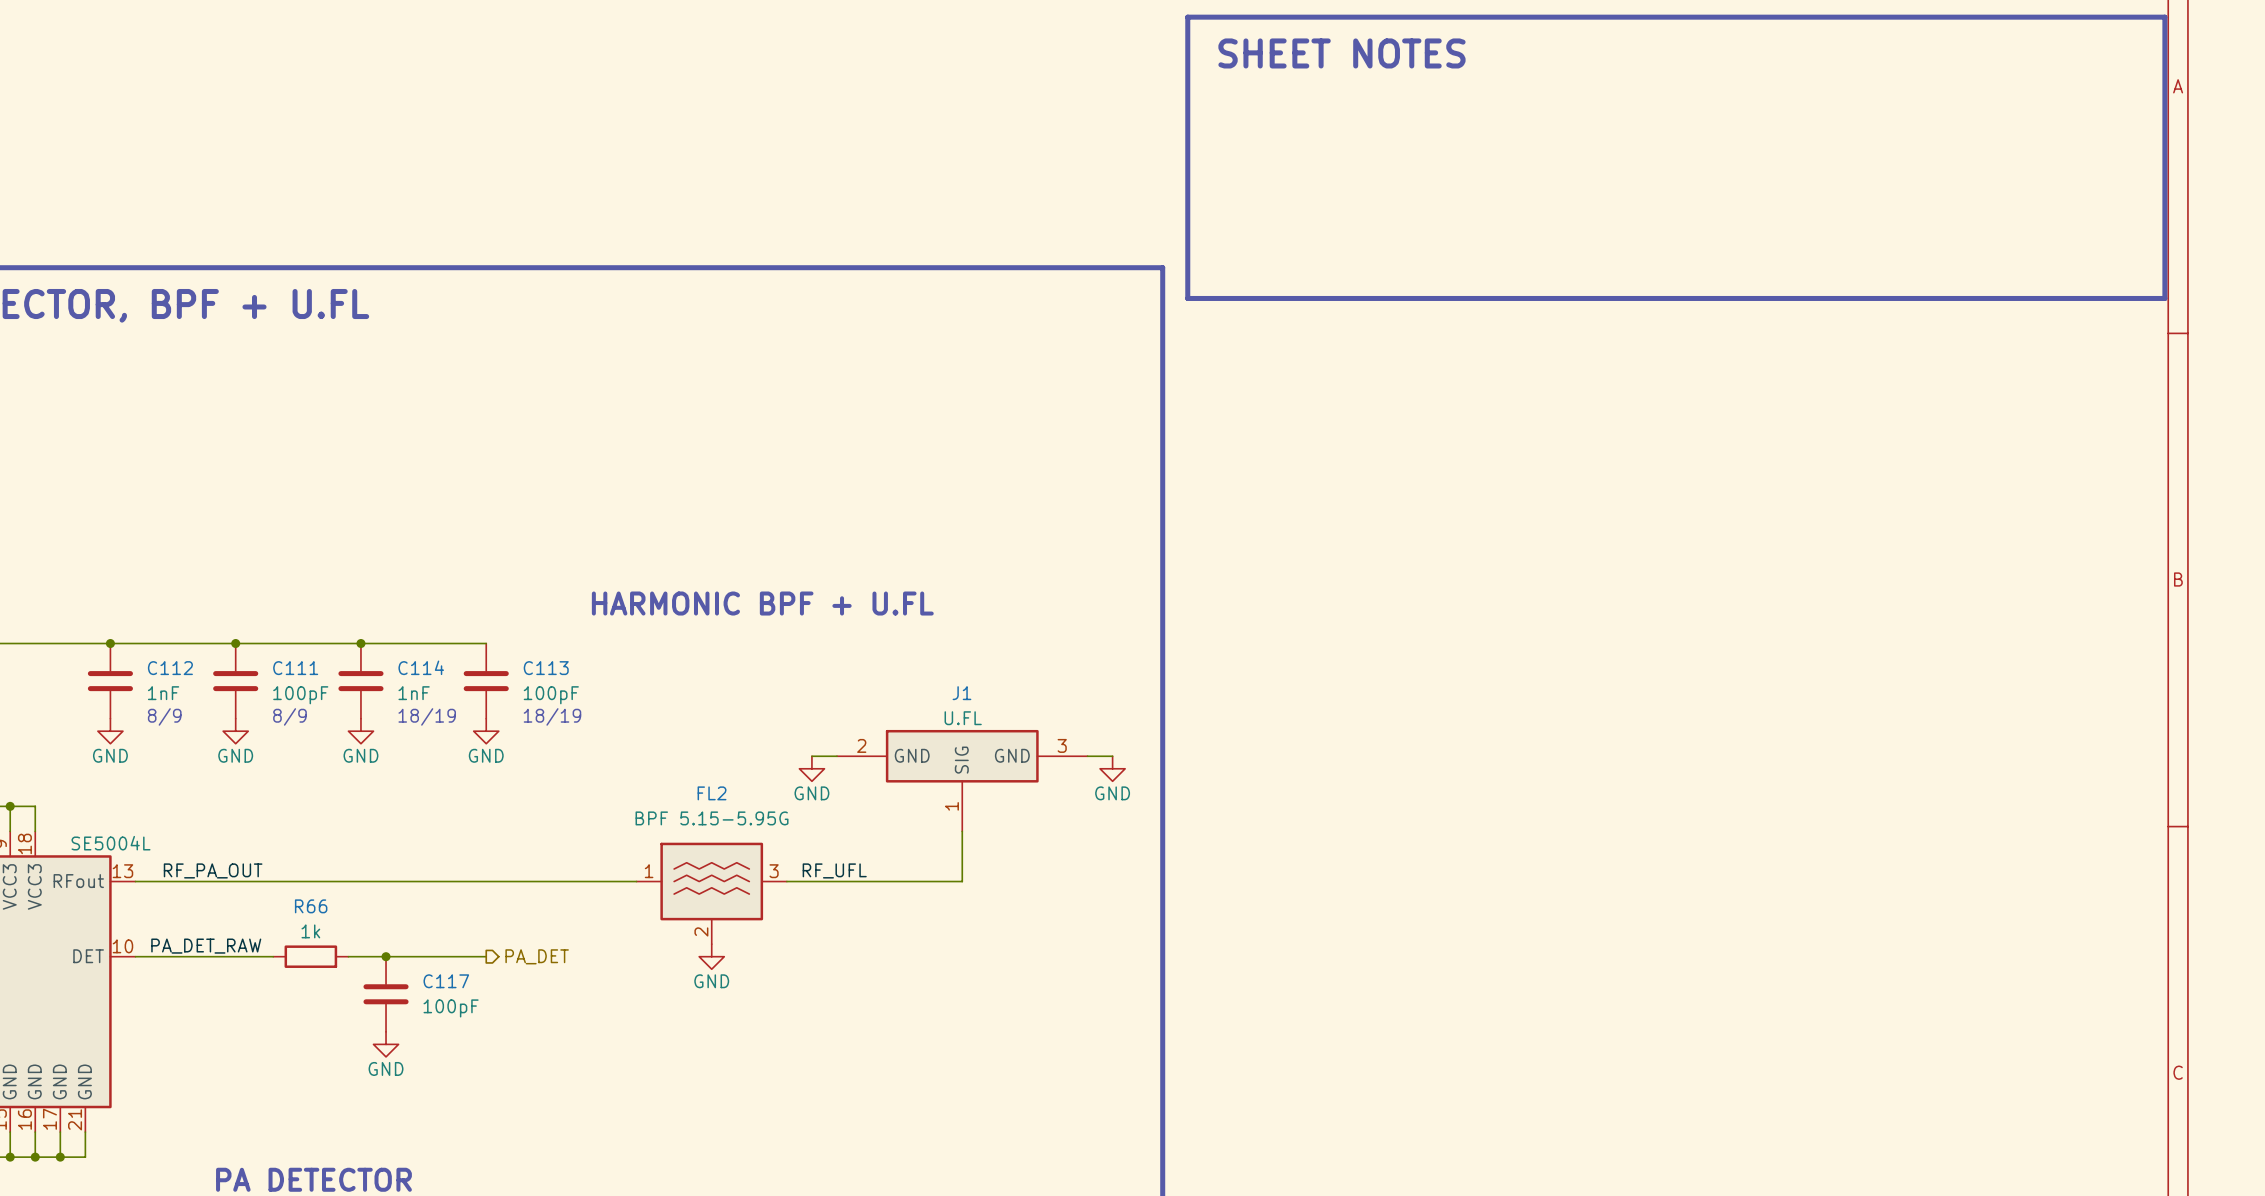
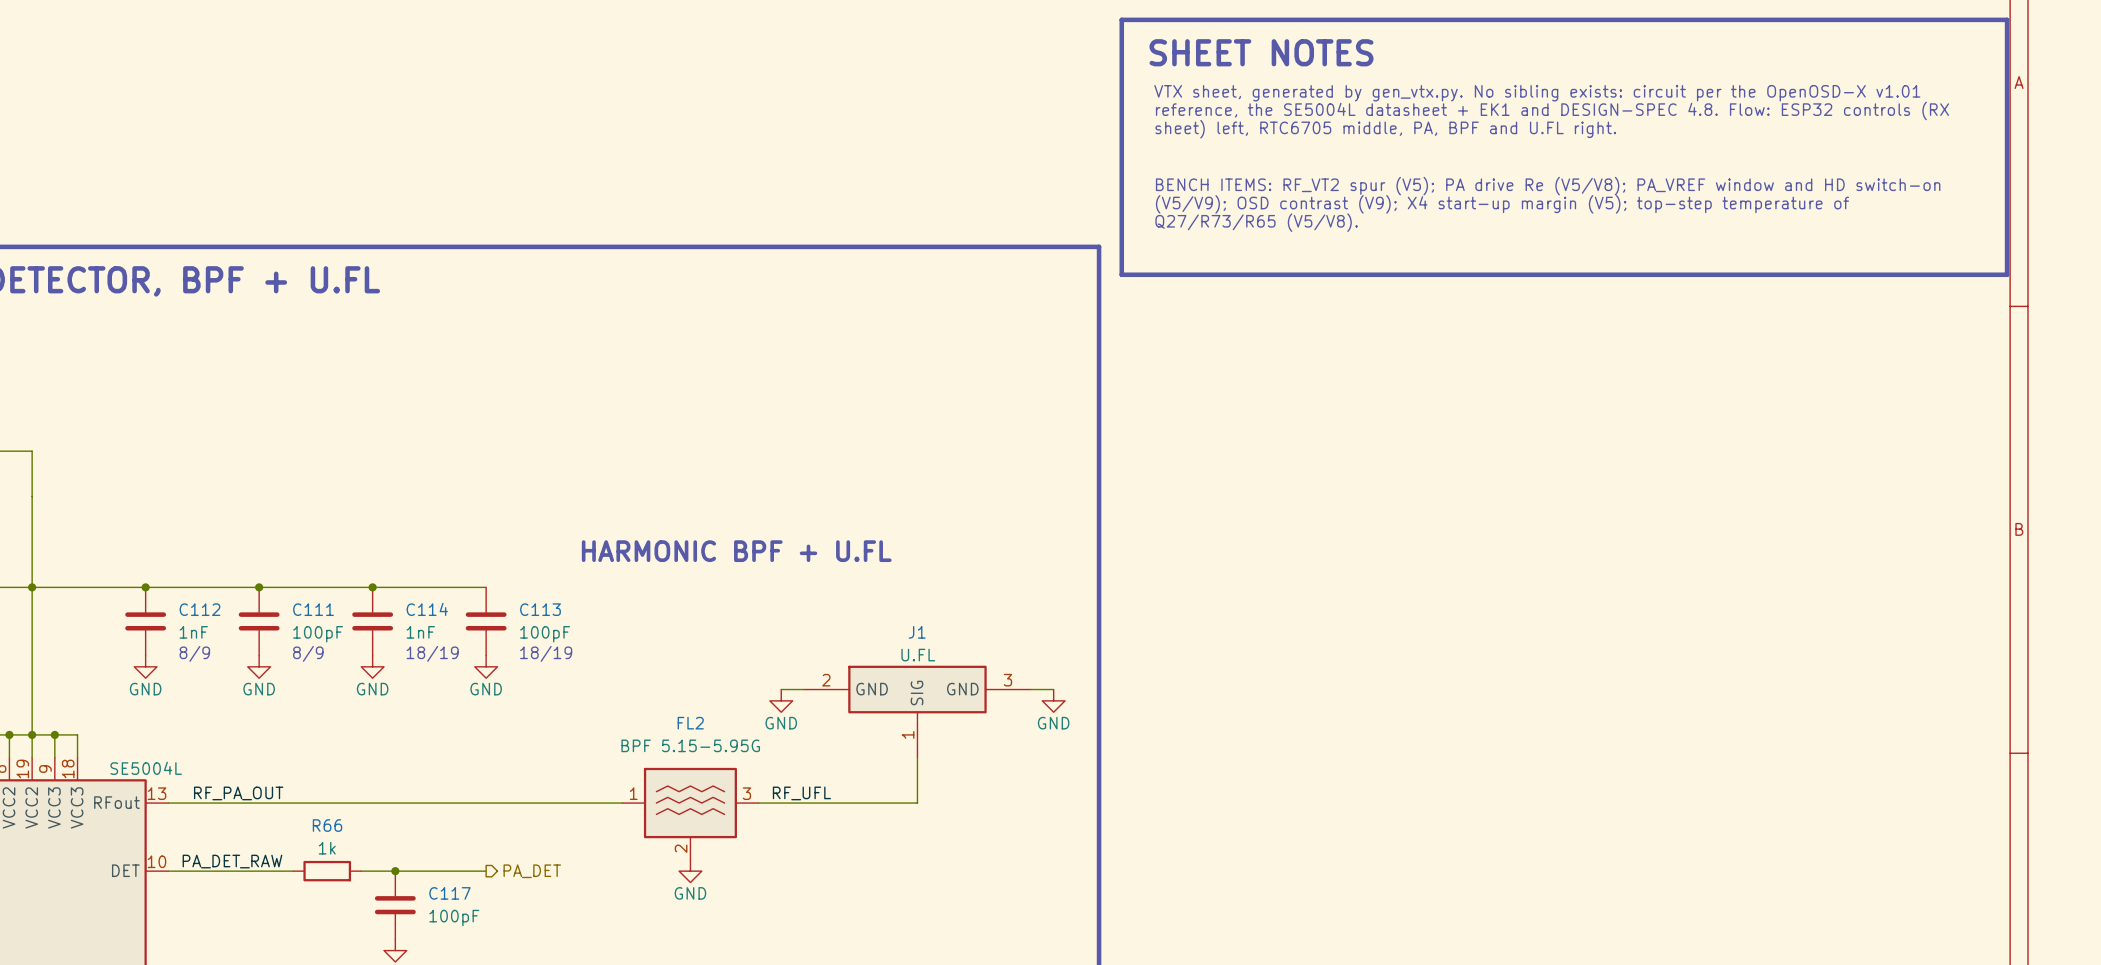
text: none -> VTX sheet, generated by gen_vtx.py. No sibling exists: circuit per the OpenOSD-X v1.01 (1537, 93)
text: none -> reference, the SE5004L datasheet + EK1 and DESIGN-SPEC 4.8. Flow: ESP32 controls (RX (1552, 110)
text: none -> sheet) left, RTC6705 middle, PA, BPF and U.FL right. (1385, 129)
text: none -> BENCH ITEMS: RF_VT2 spur (V5); PA drive Re (V5/V8); PA_VREF window and HD switch-on (1548, 186)
text: none -> (V5/V9); OSD contrast (V9); X4 start-up margin (V5); top-step temperature of (1502, 204)
text: none -> Q27/R73/R65 (V5/V8). (1256, 222)

